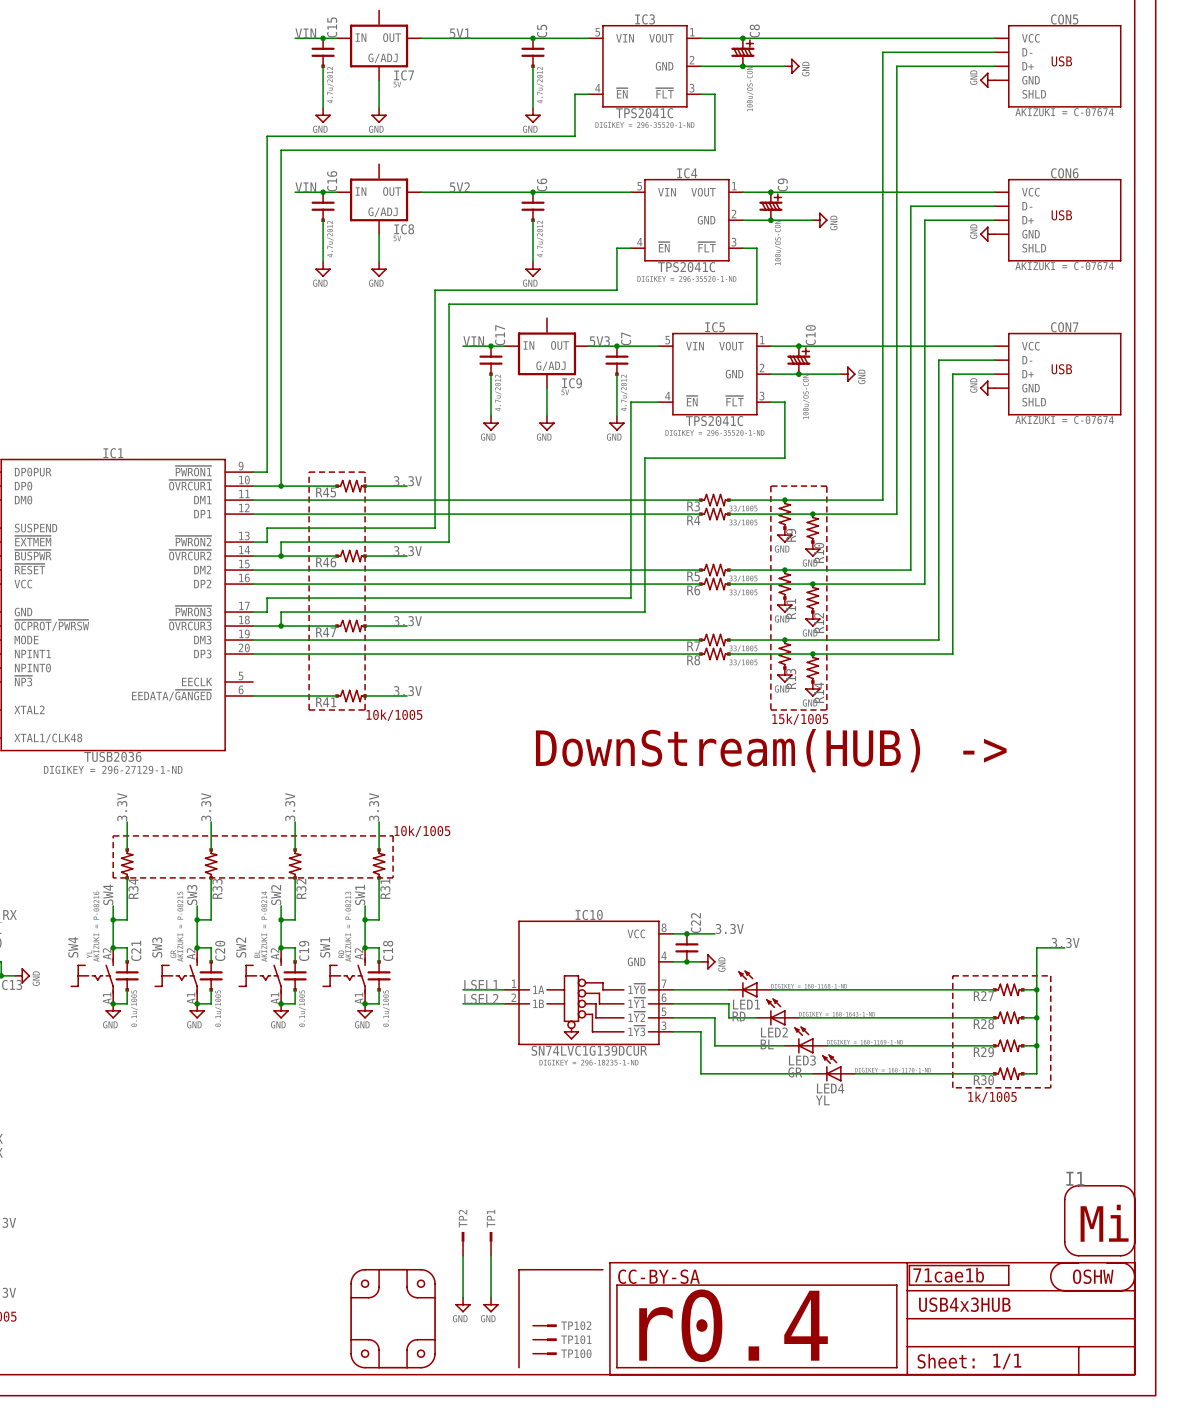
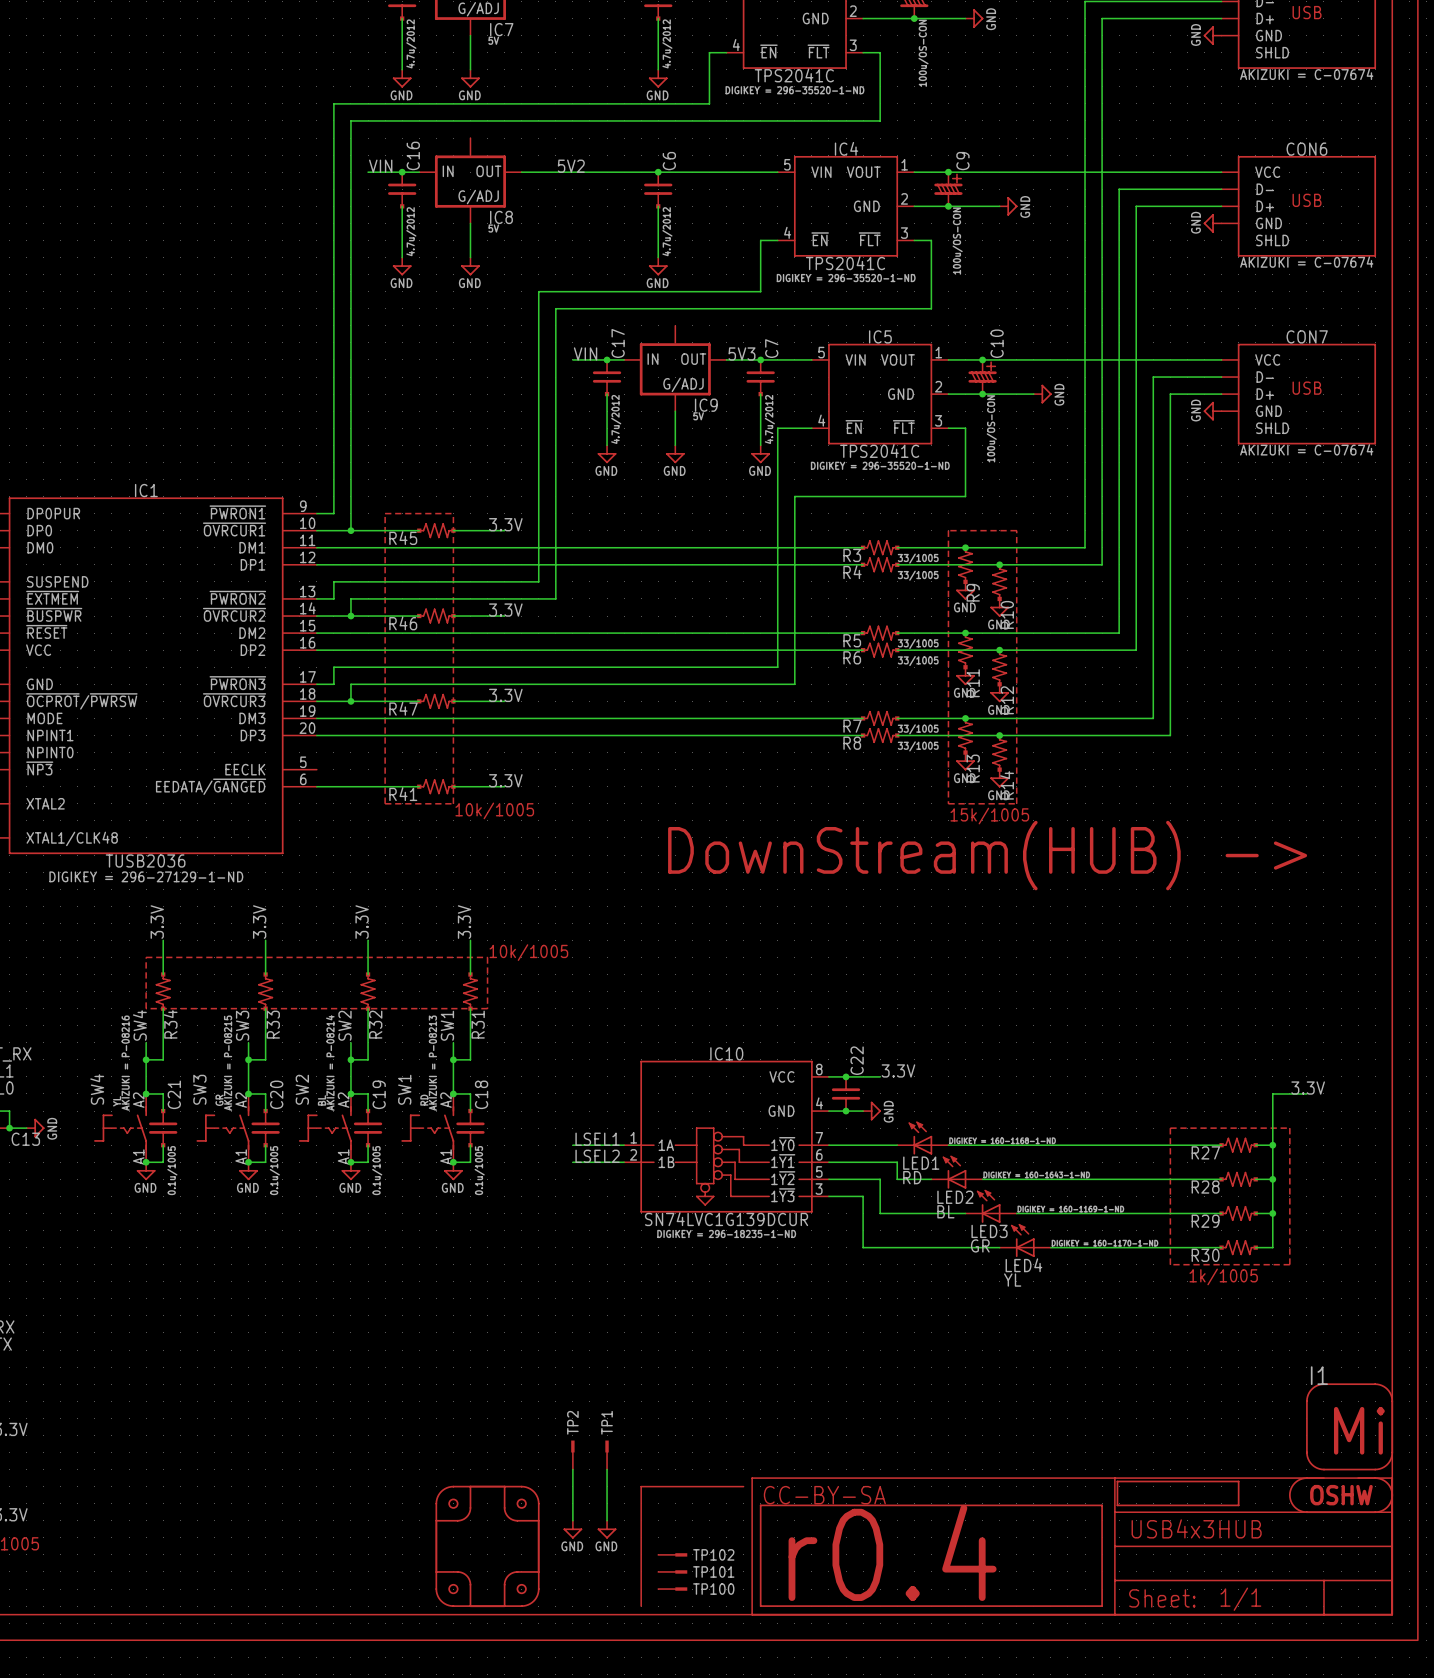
part value: 71cae1b (948, 1275) -> none

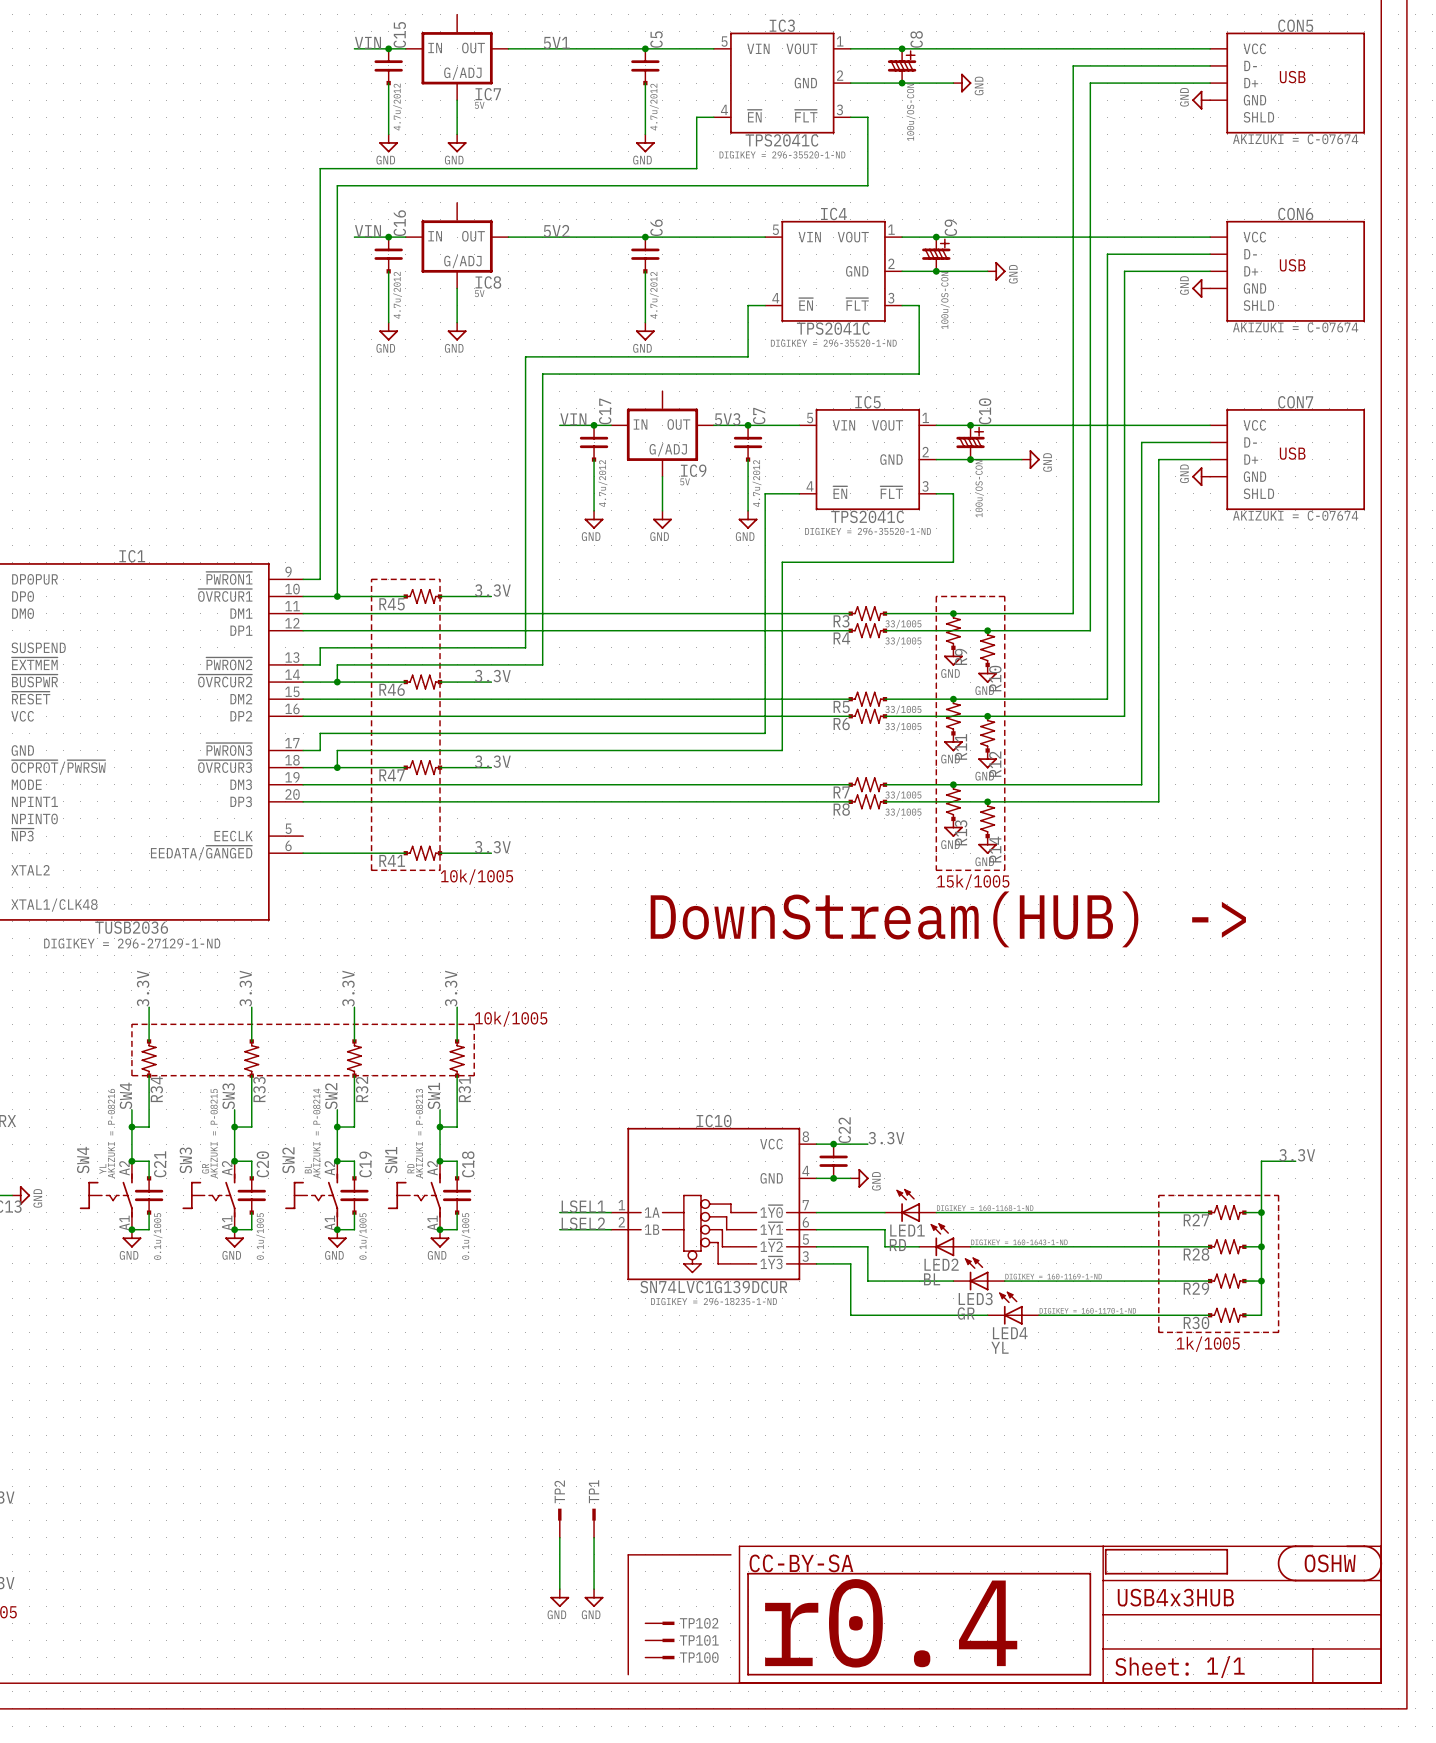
I1: (1349, 1426) -> none
line: (470, 1486) (504, 1486) -> none
part: (453, 1503) -> none
part: (521, 1503) -> none
line: (436, 1520) (436, 1571) -> none
line: (538, 1520) (538, 1571) -> none
part: (453, 1589) -> none
part: (521, 1589) -> none
line: (470, 1606) (504, 1606) -> none

